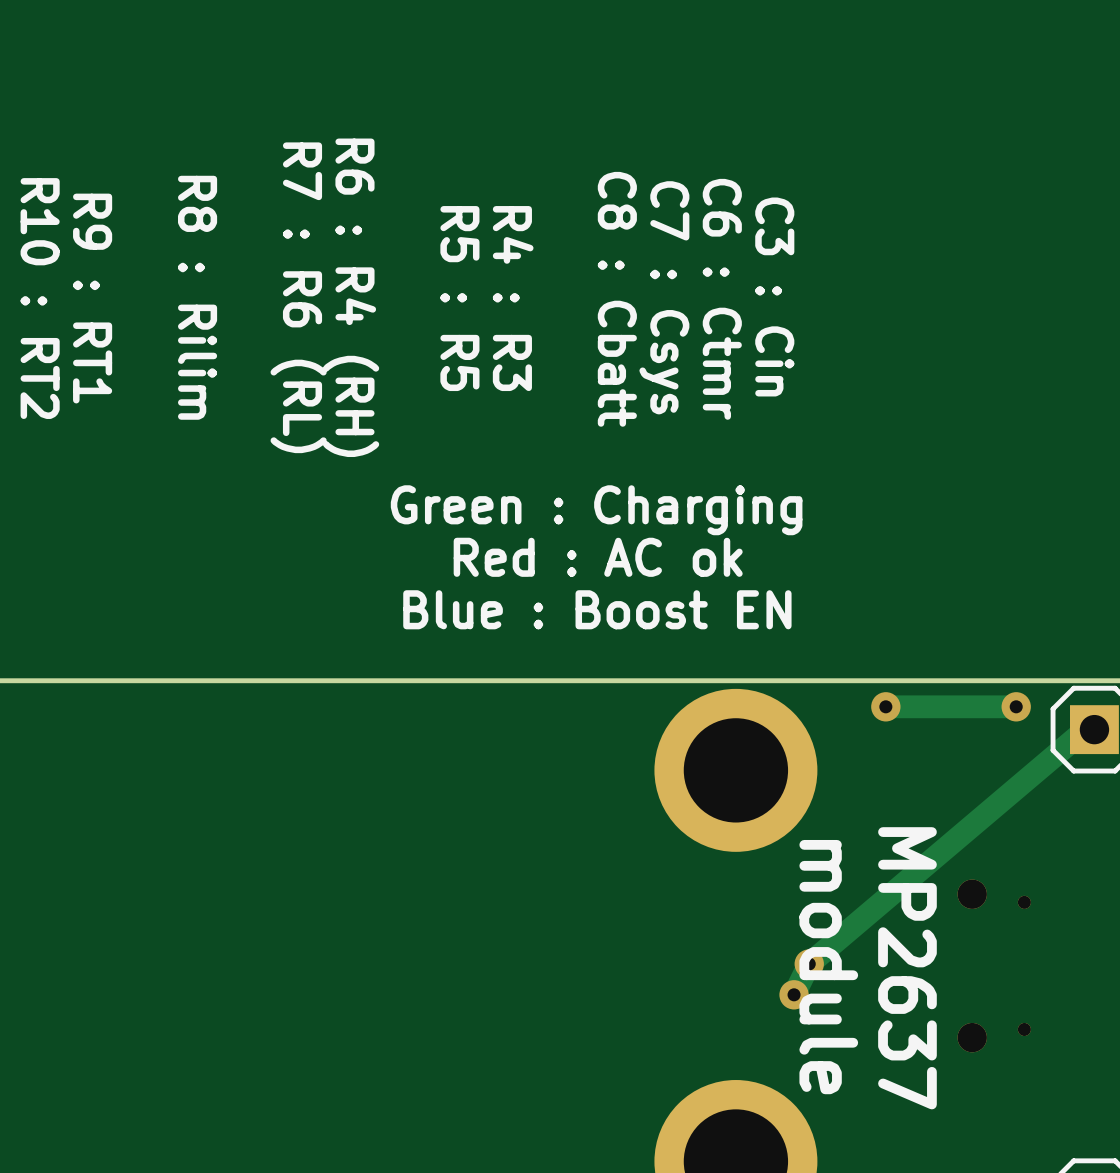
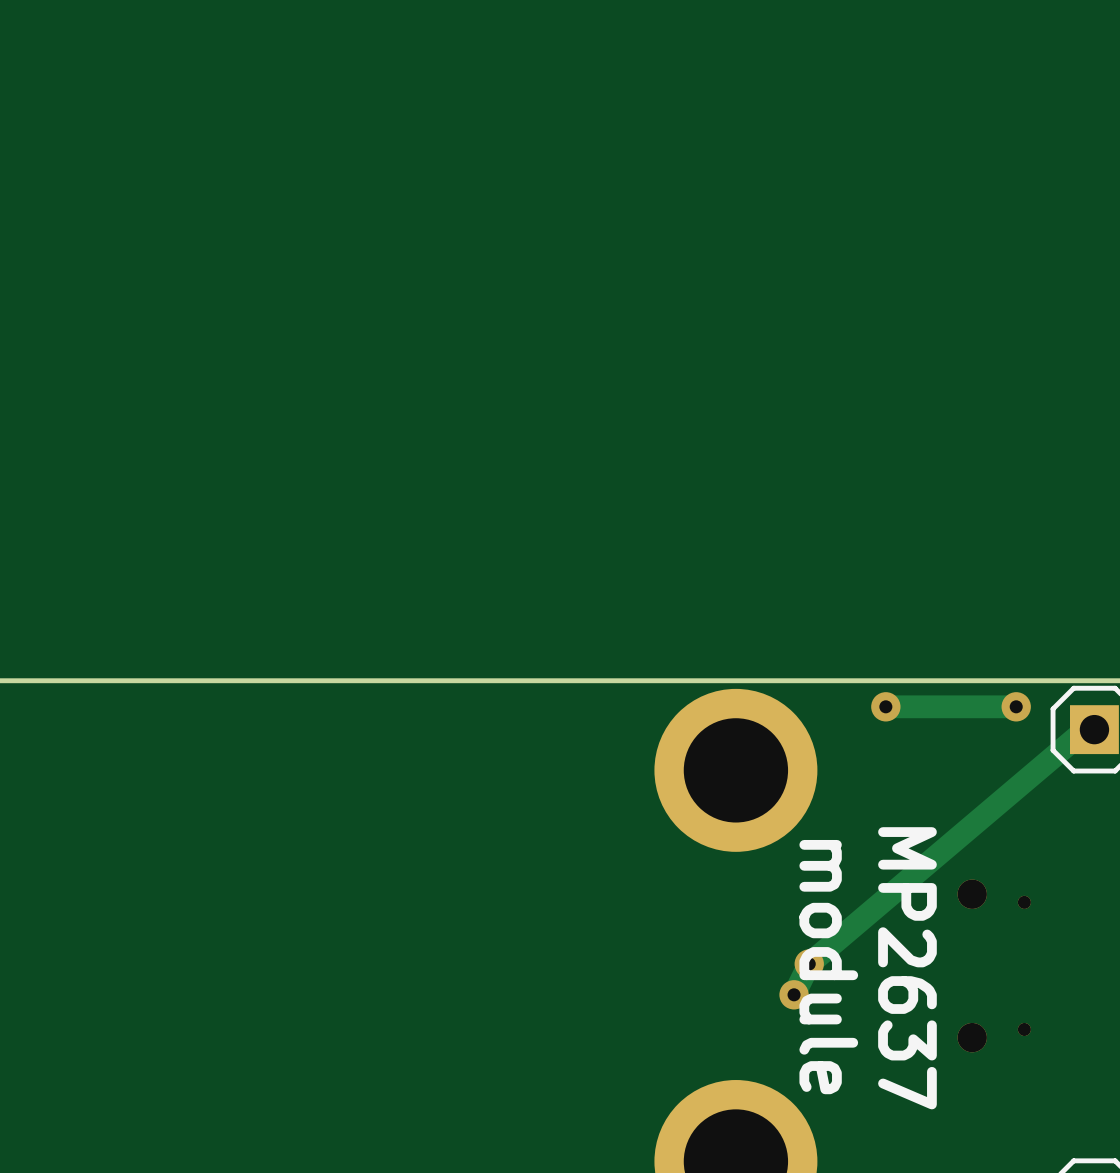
text: C3 : Cin (774, 296) -> none
text: R8 : Rilim (197, 297) -> none
text: R7 : R6 (RL) (298, 297) -> none
text: R6 : R4 (RH) (351, 297) -> none
text: C7 : Csys (664, 297) -> none
text: R10 : RT2 (40, 298) -> none
text: R9 : RT1 (92, 298) -> none
text: R5 : R5 (459, 298) -> none
text: R4 : R3 (513, 298) -> none
text: C8 : Cbatt (617, 299) -> none
text: C6 : Ctmr (722, 299) -> none
text: Green : Charging (596, 510) -> none
text: Red : AC ok (598, 557) -> none
text: Blue : Boost EN (597, 609) -> none

